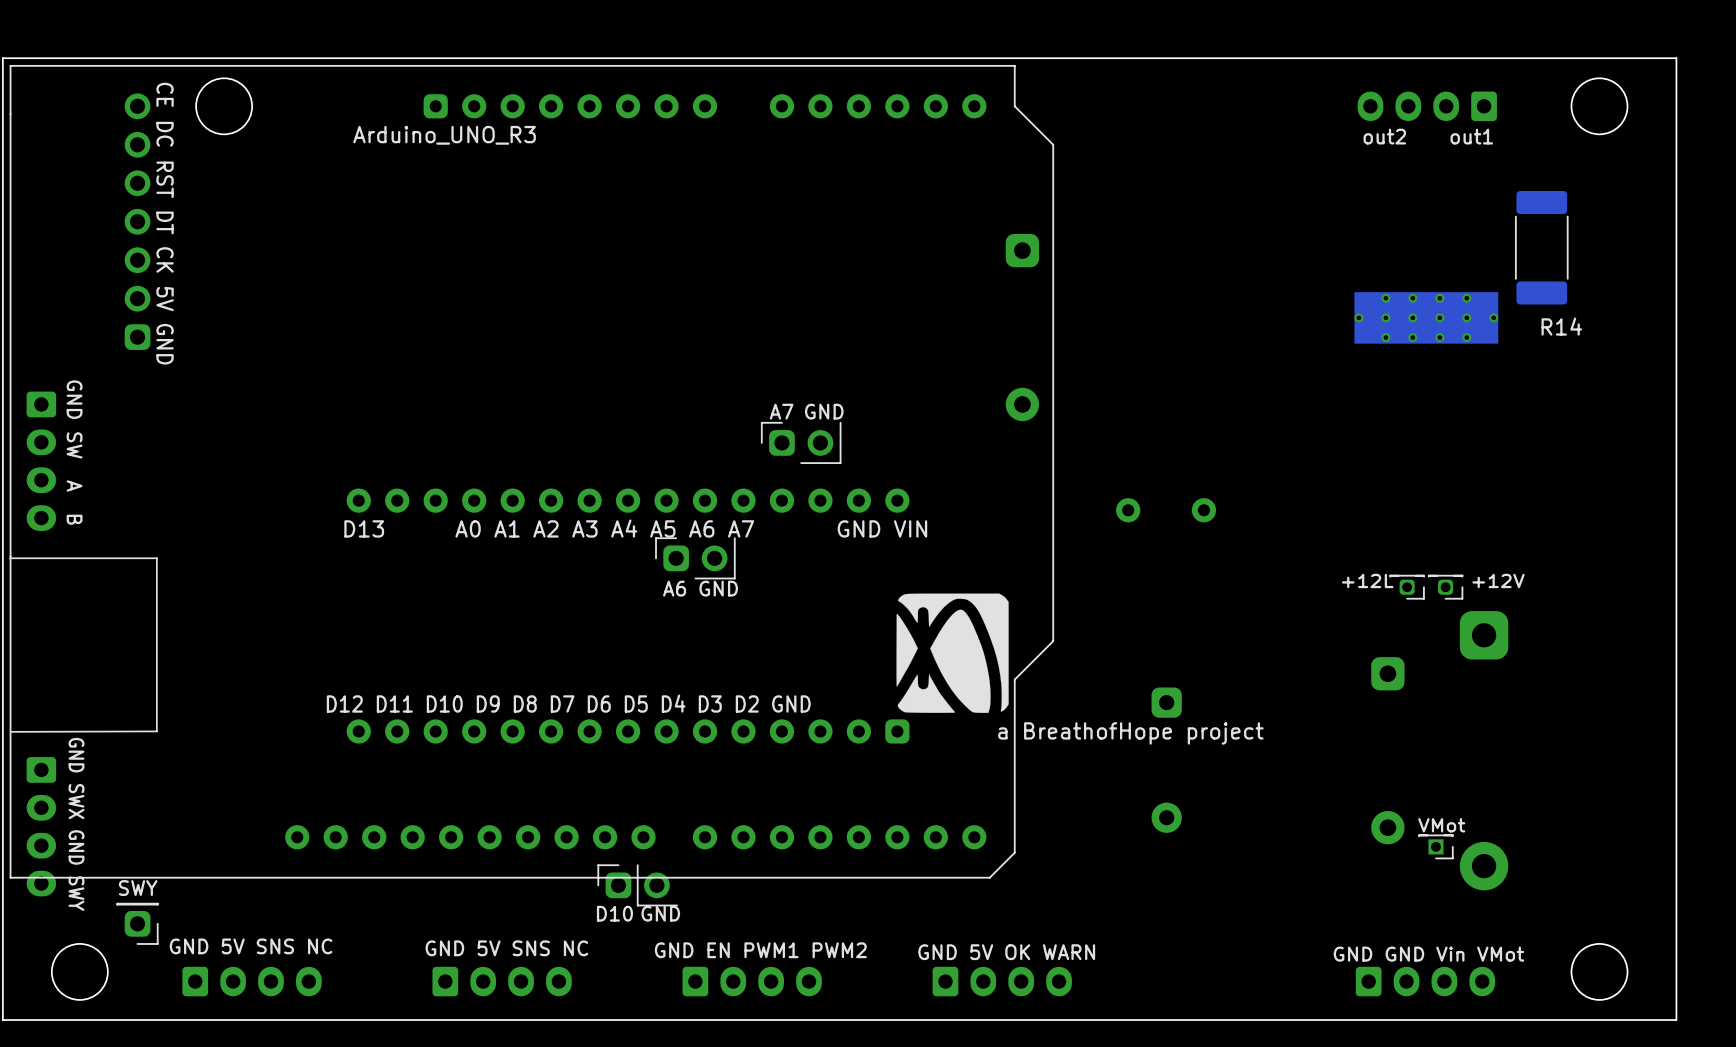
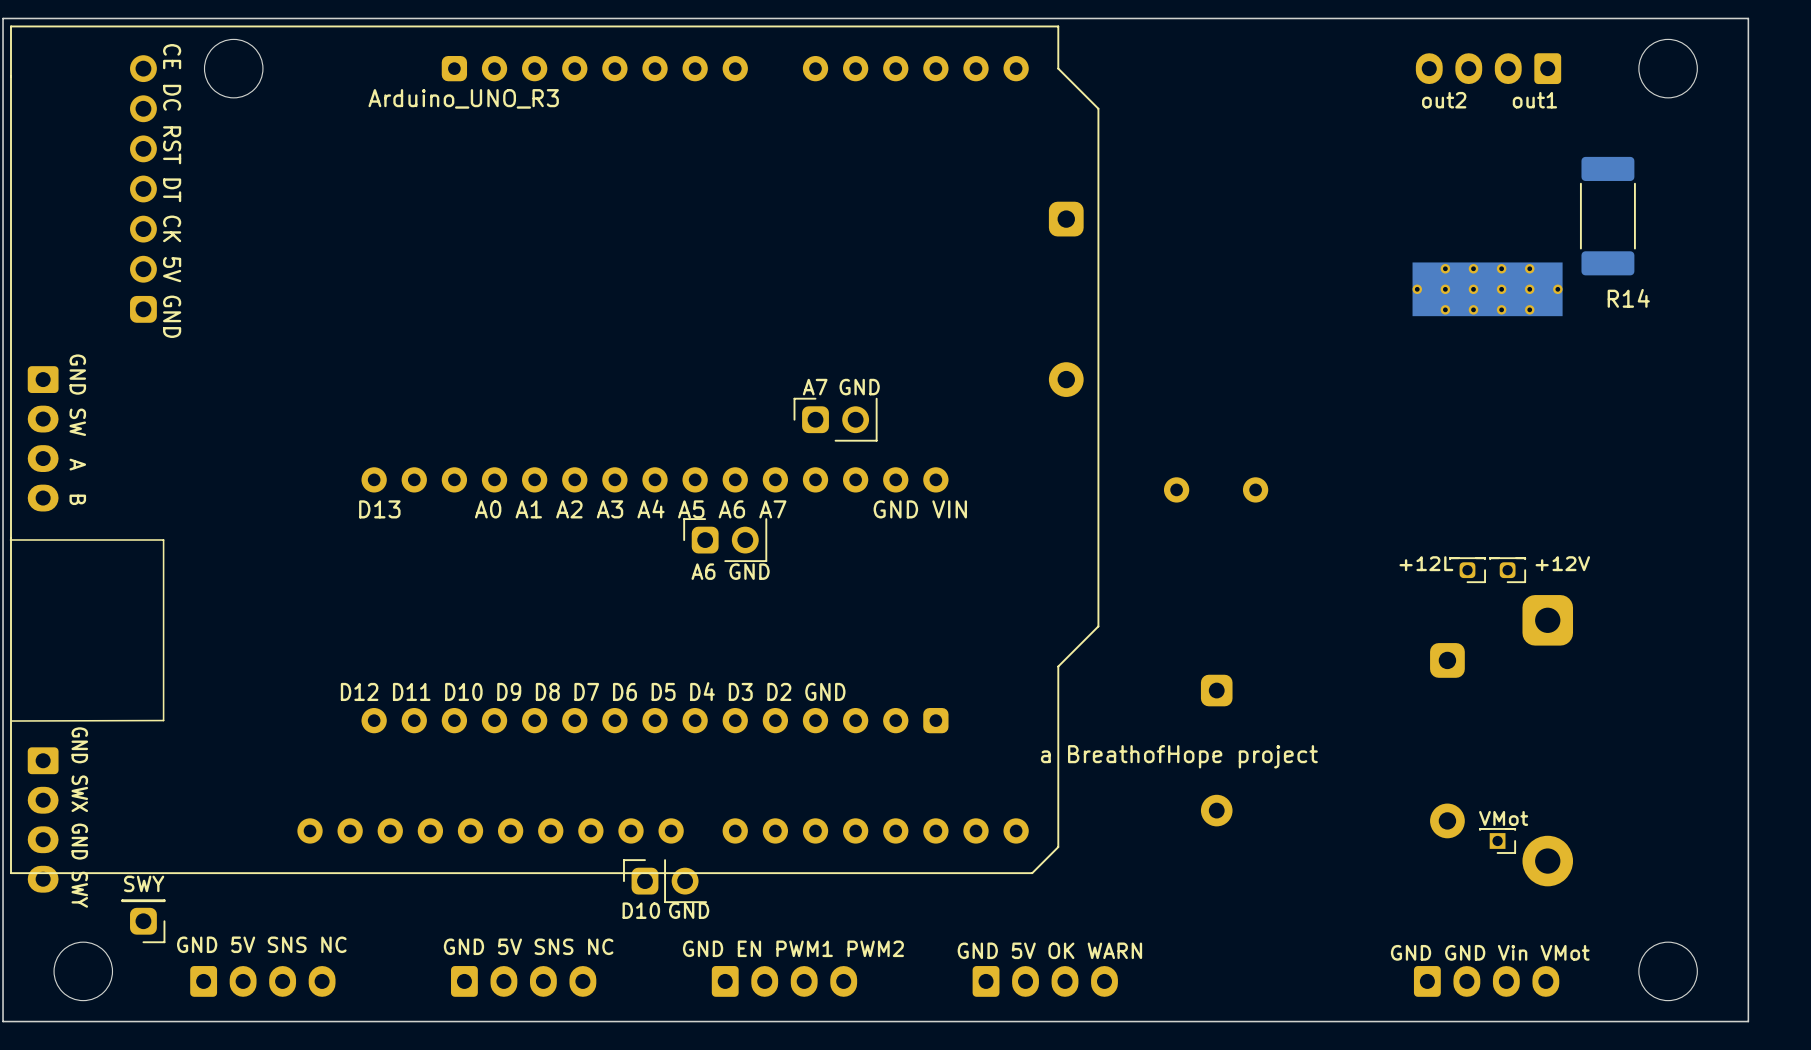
drawing: [896, 593, 1009, 713] -> none
text position: a BreathofHope project (1130, 733) -> a BreathofHope project (1179, 756)

